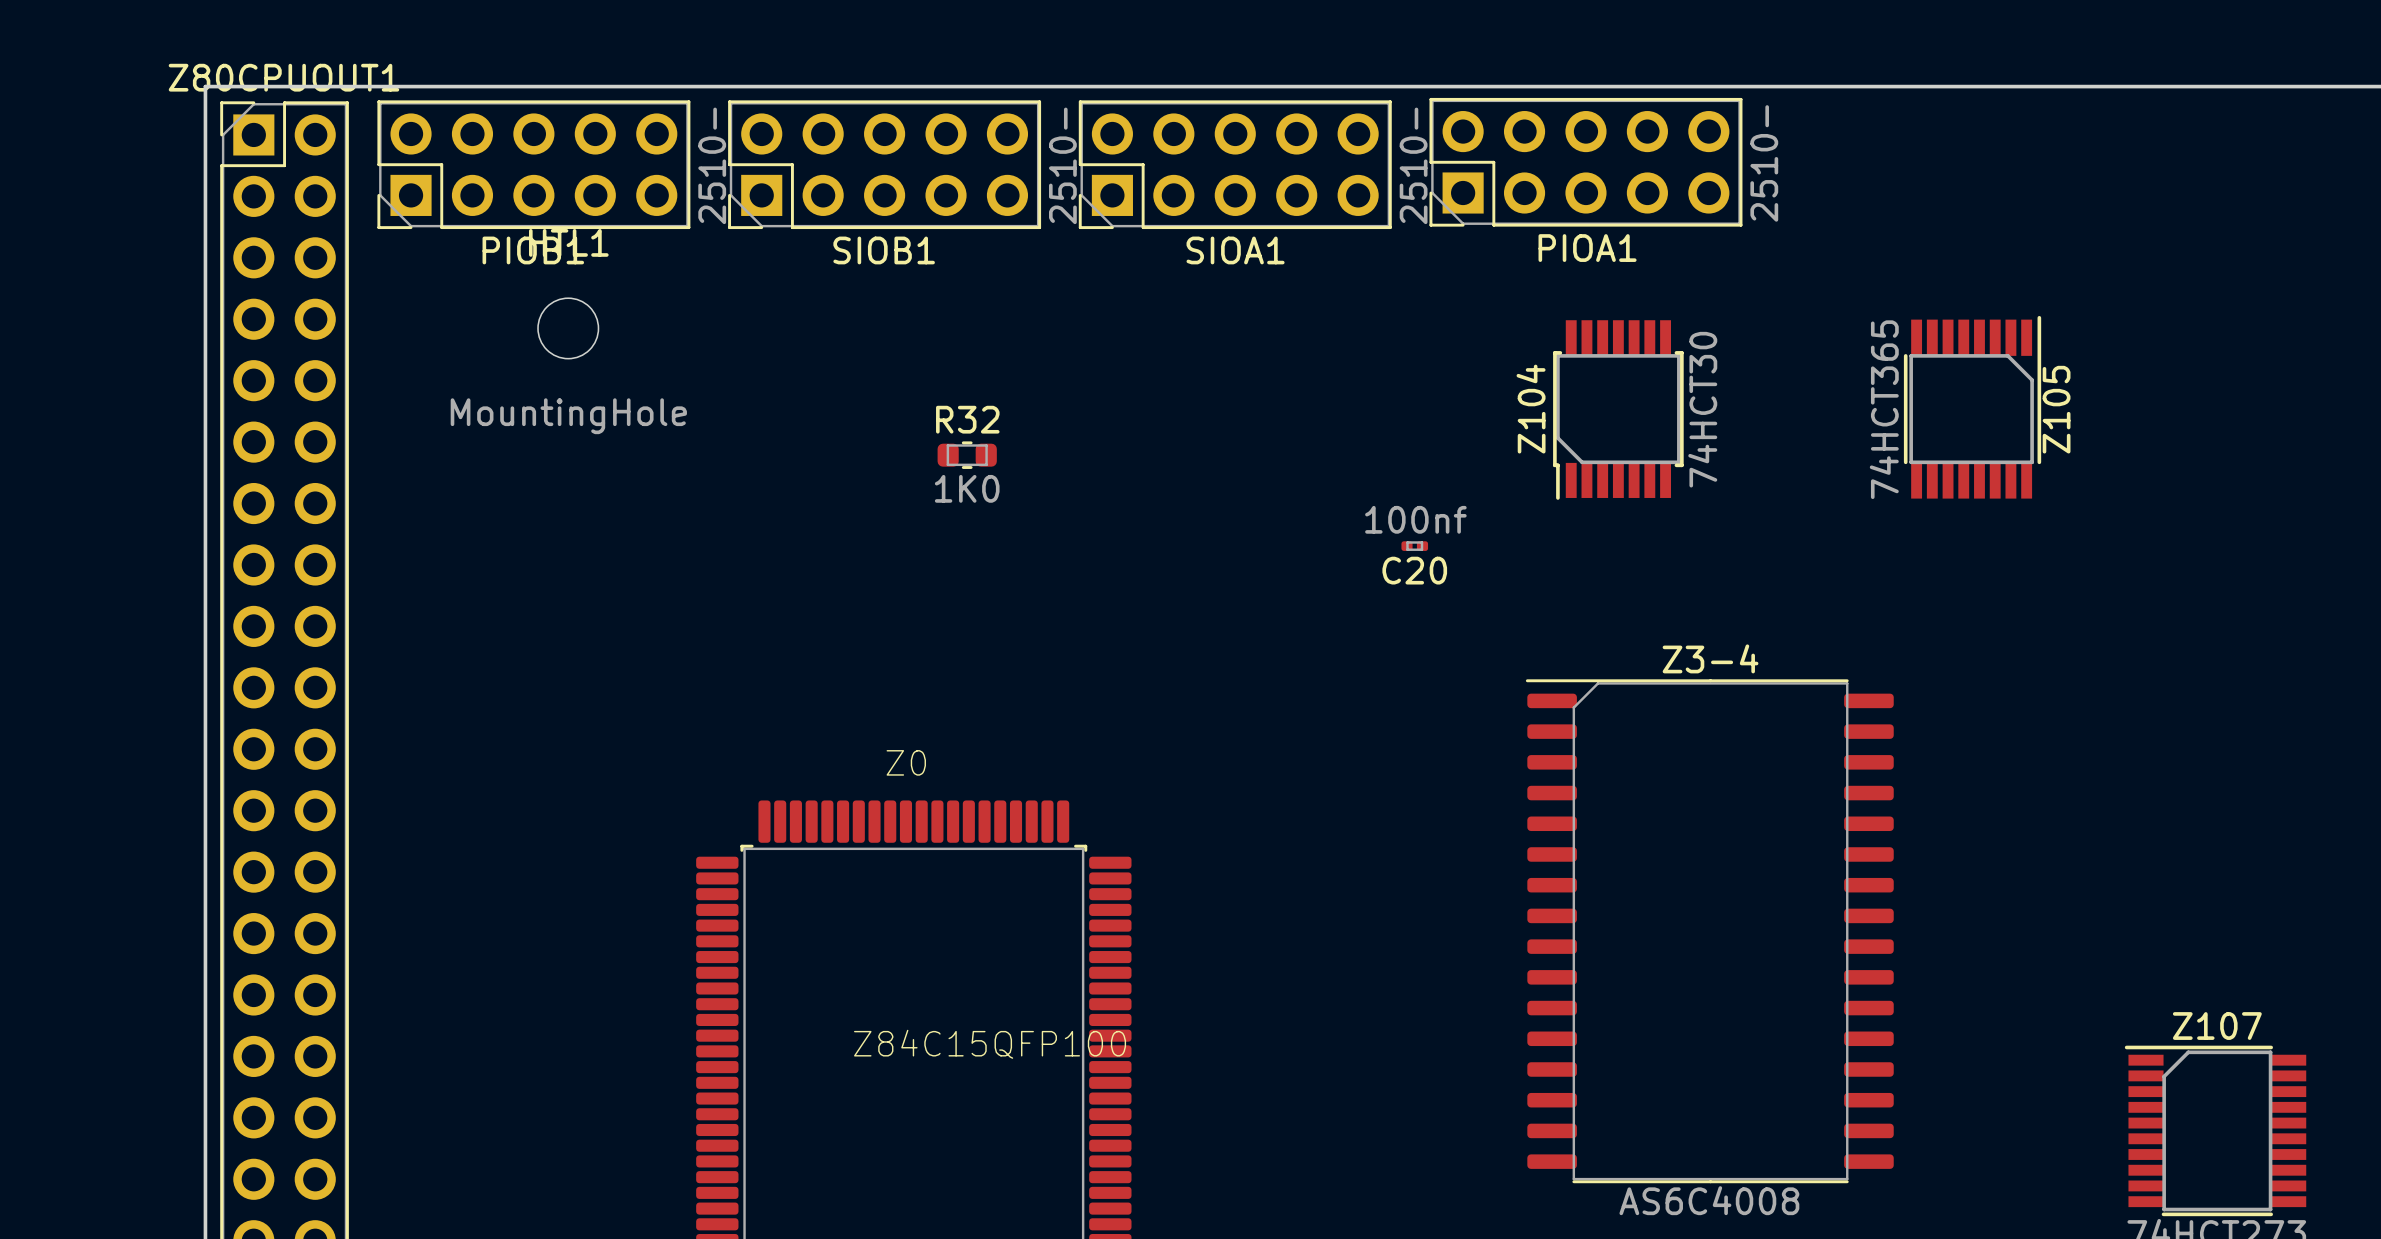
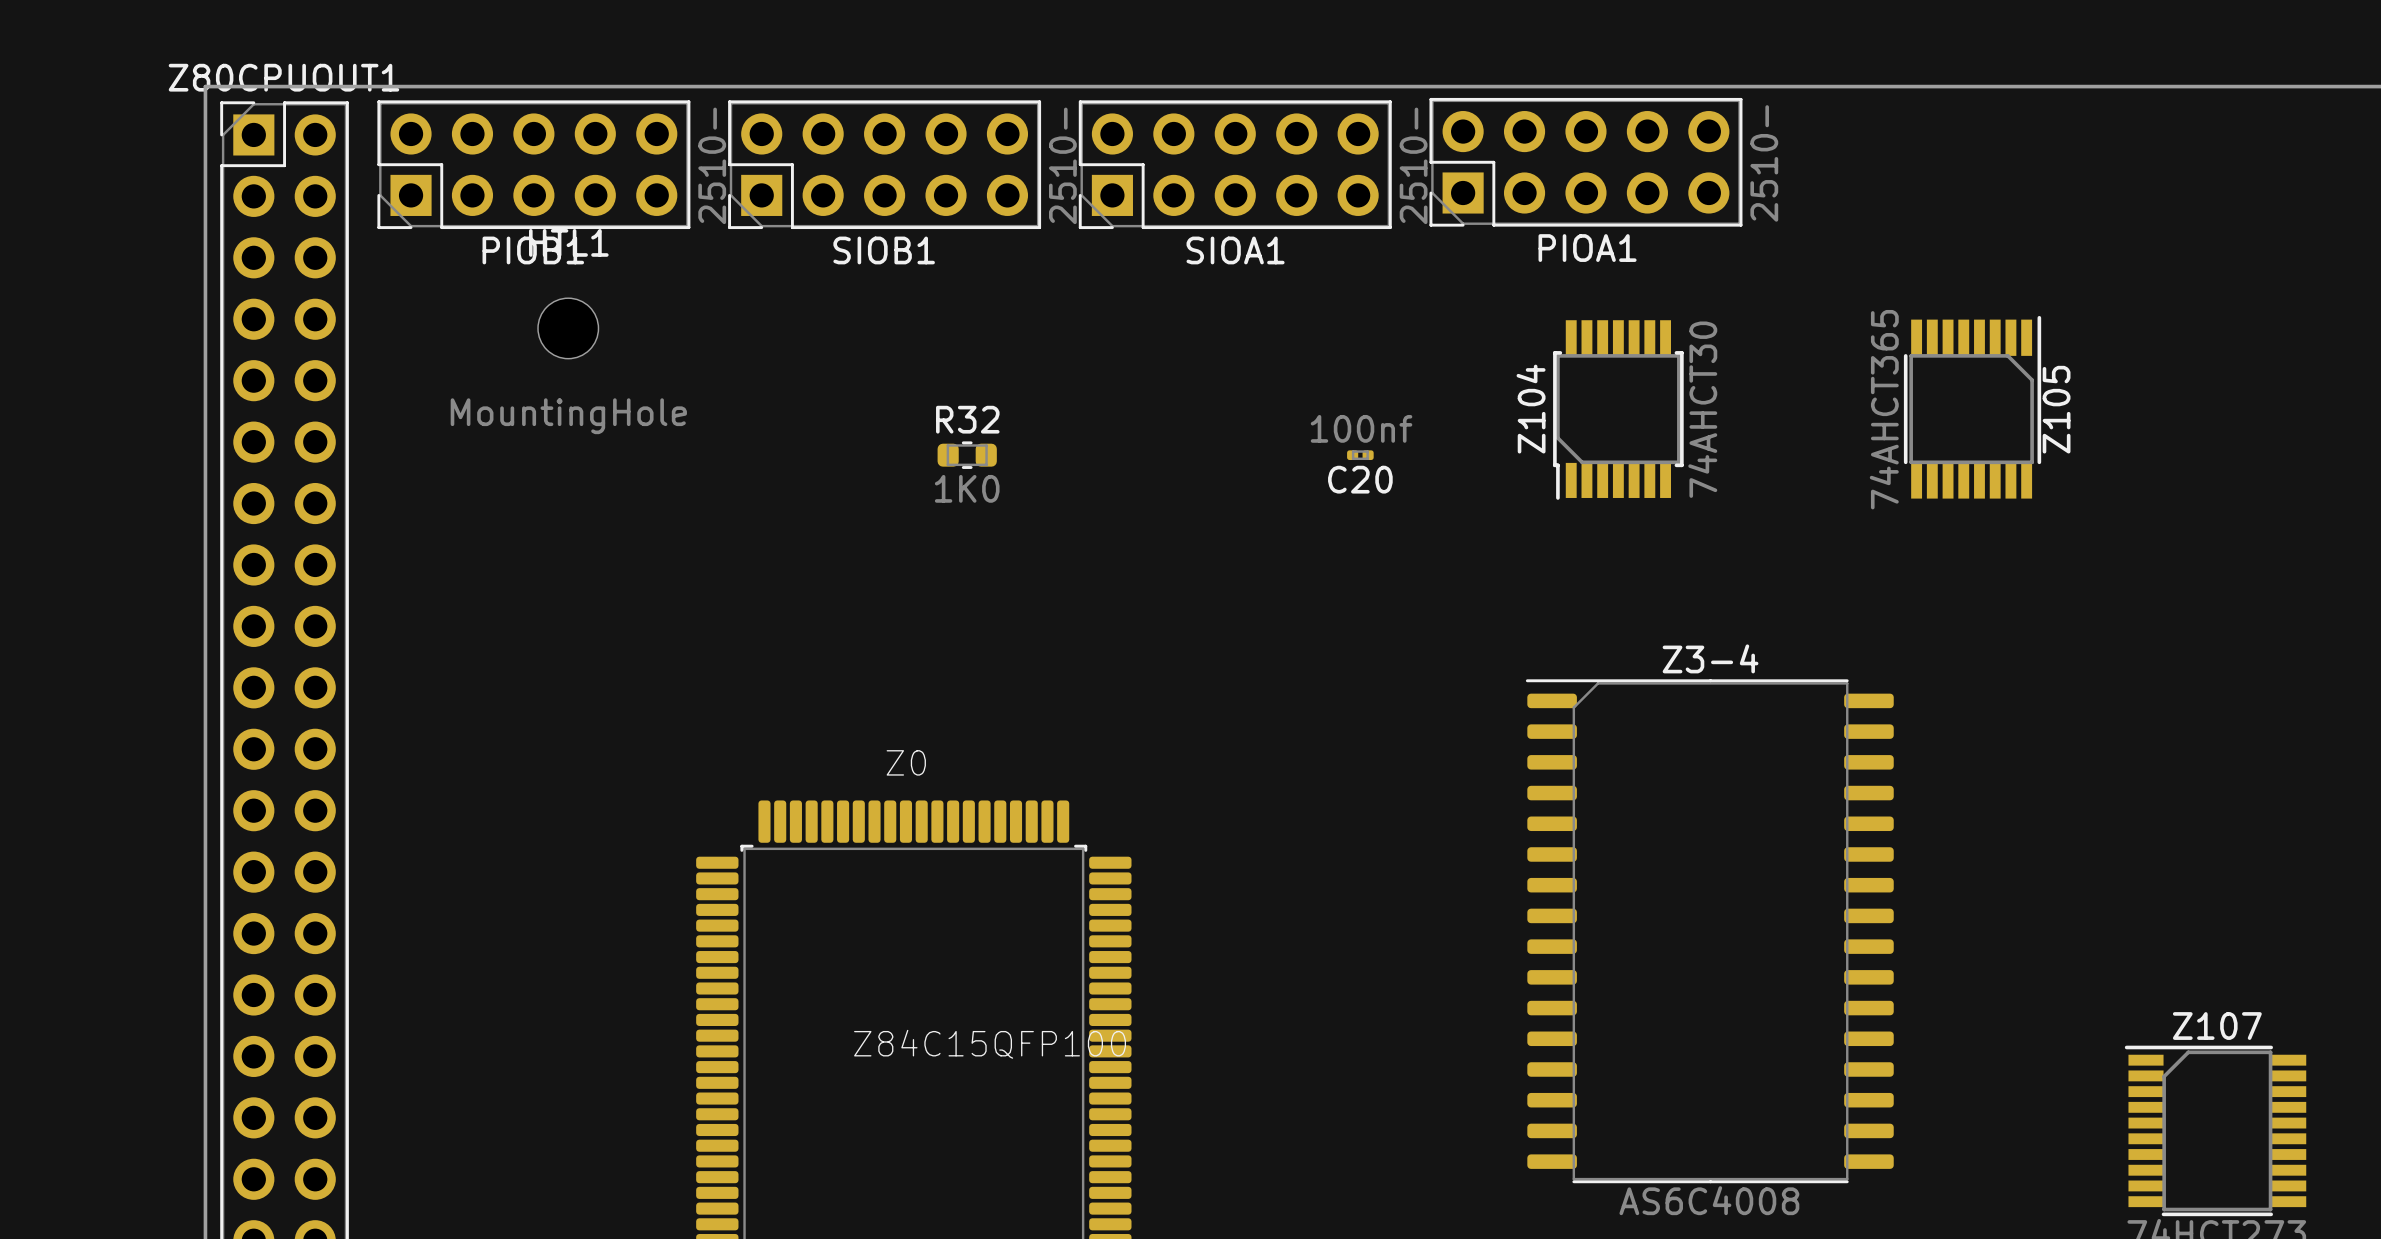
Z104 value: 74HCT30 (1702, 409) -> 74AHCT30 (1702, 409)
Z105 value: 74HCT365 (1884, 409) -> 74AHCT365 (1884, 409)
C20 position: (1414, 546) -> (1360, 455)

